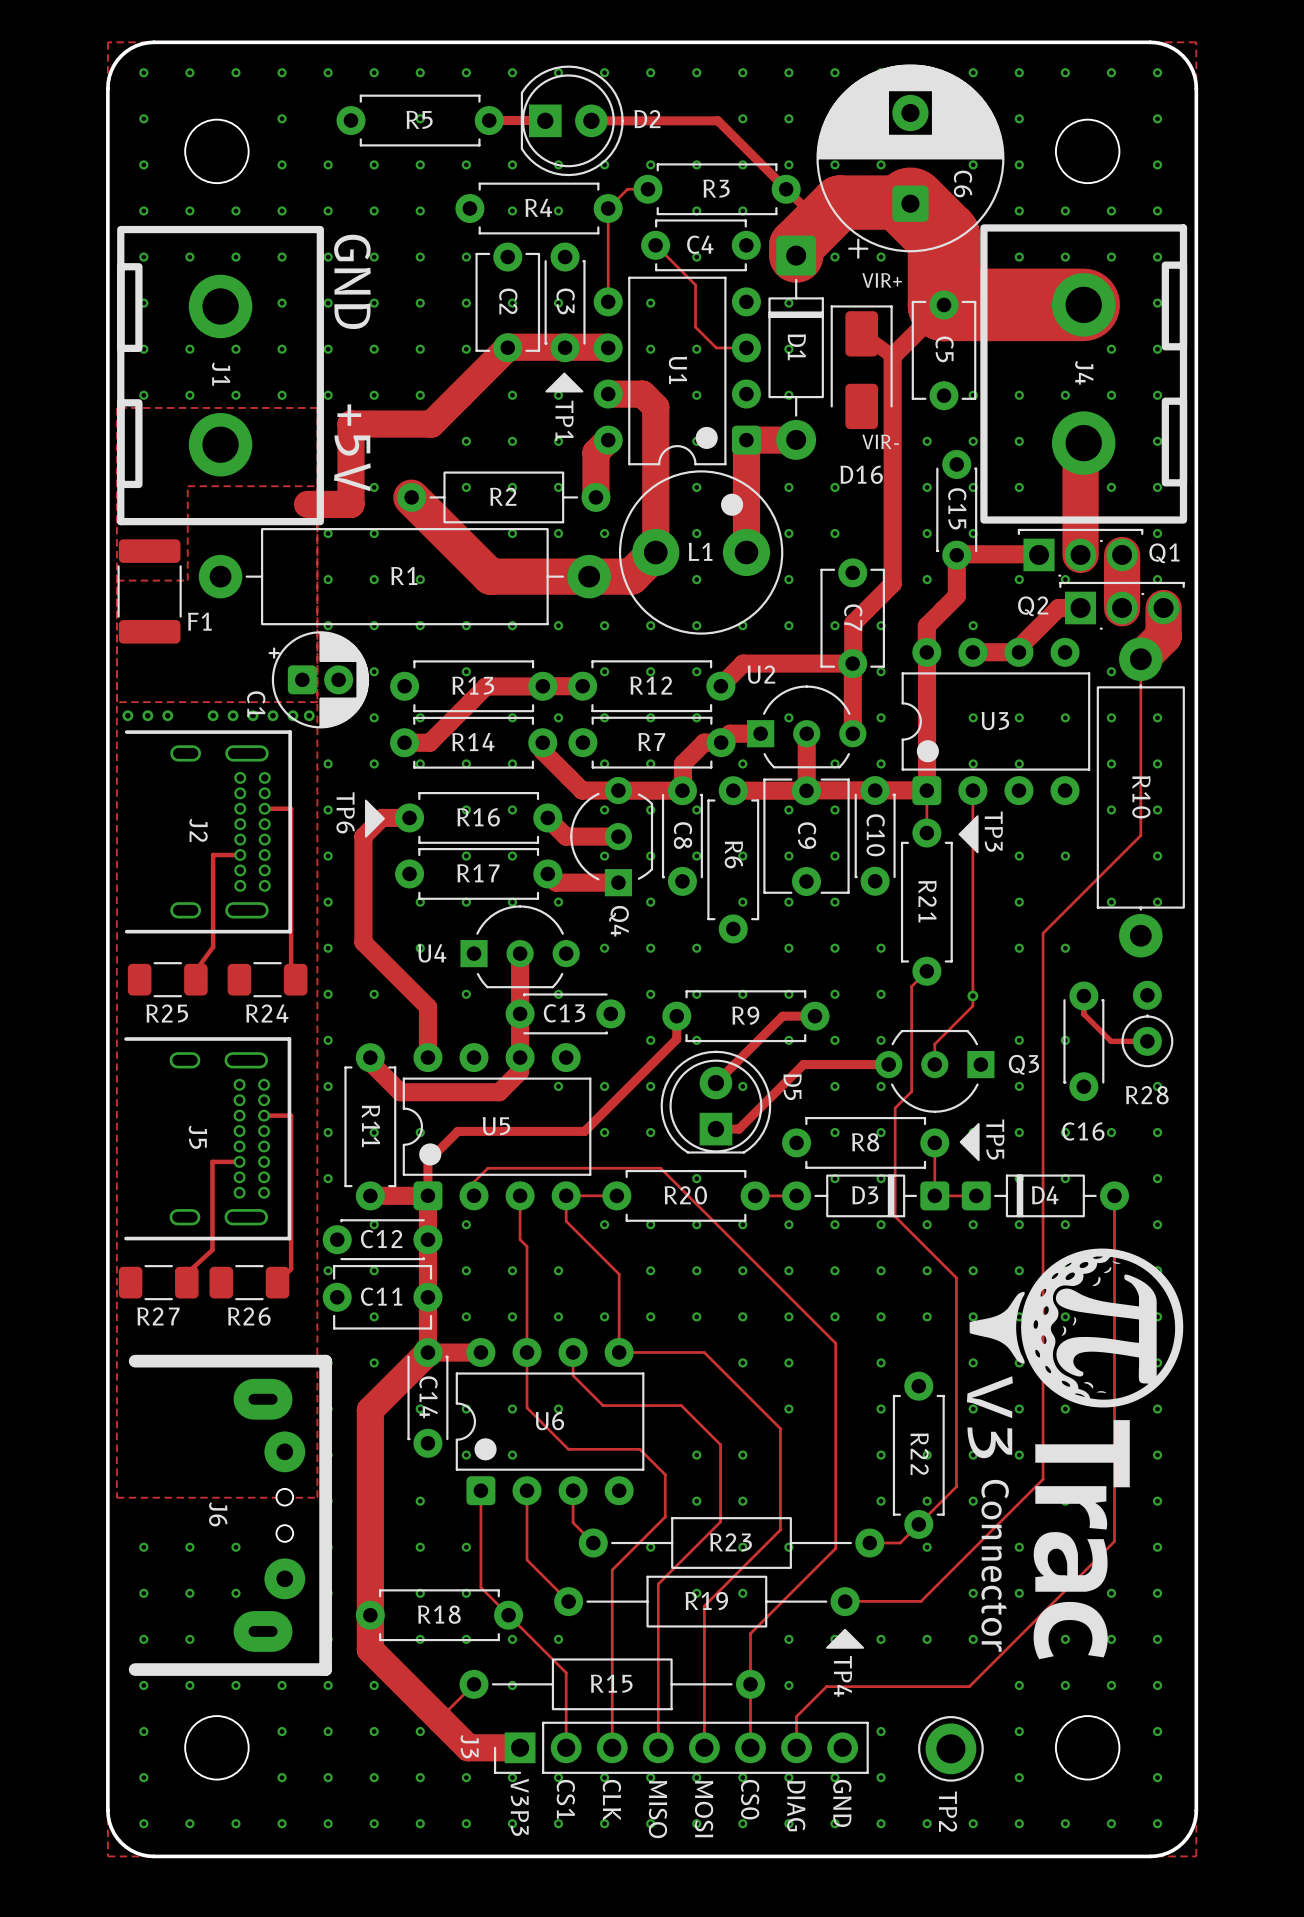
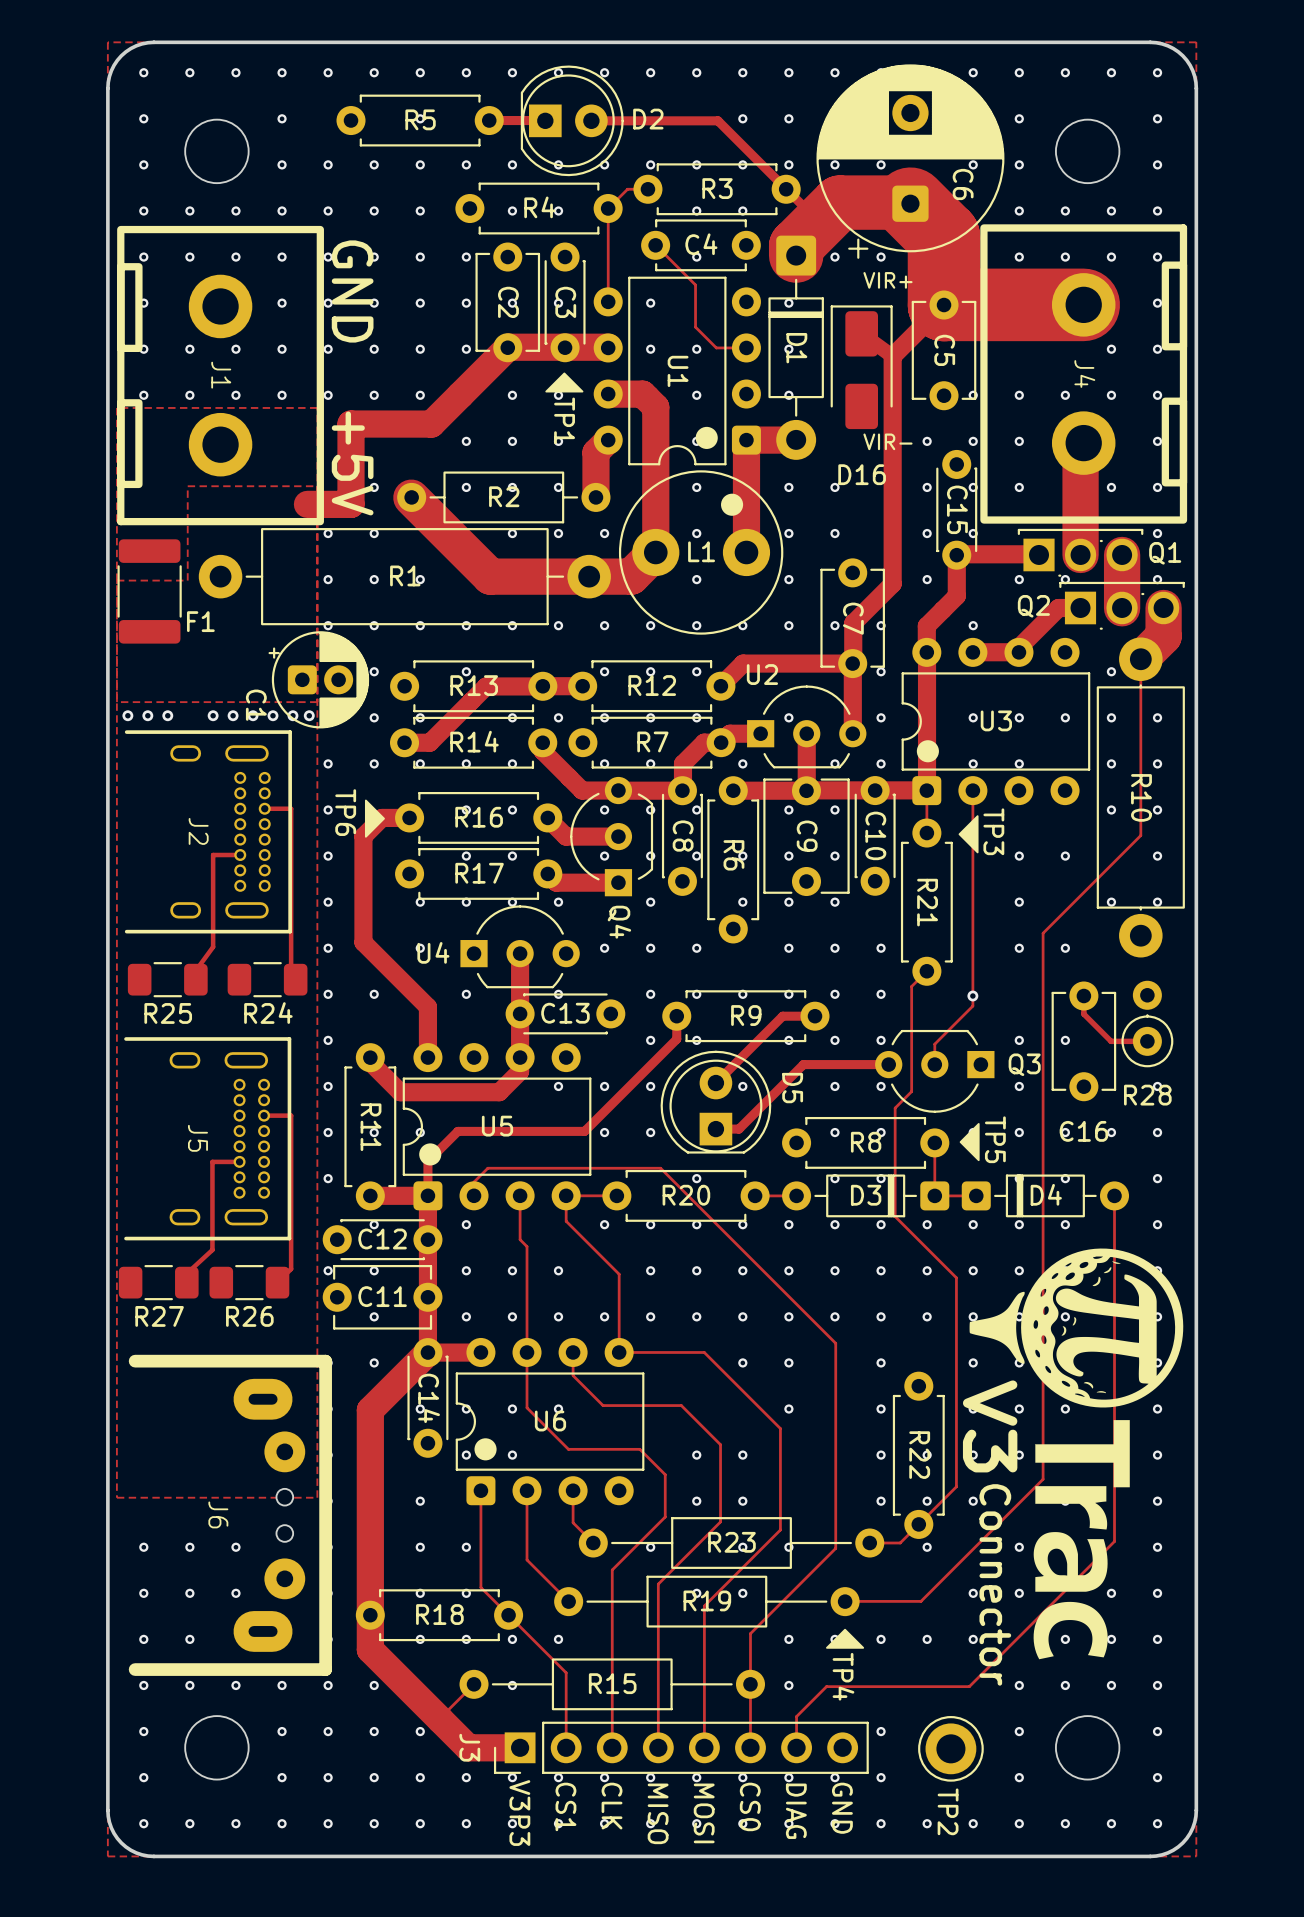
C16 footprint: [1063, 981, 1105, 1102] -> [1051, 981, 1117, 1102]

